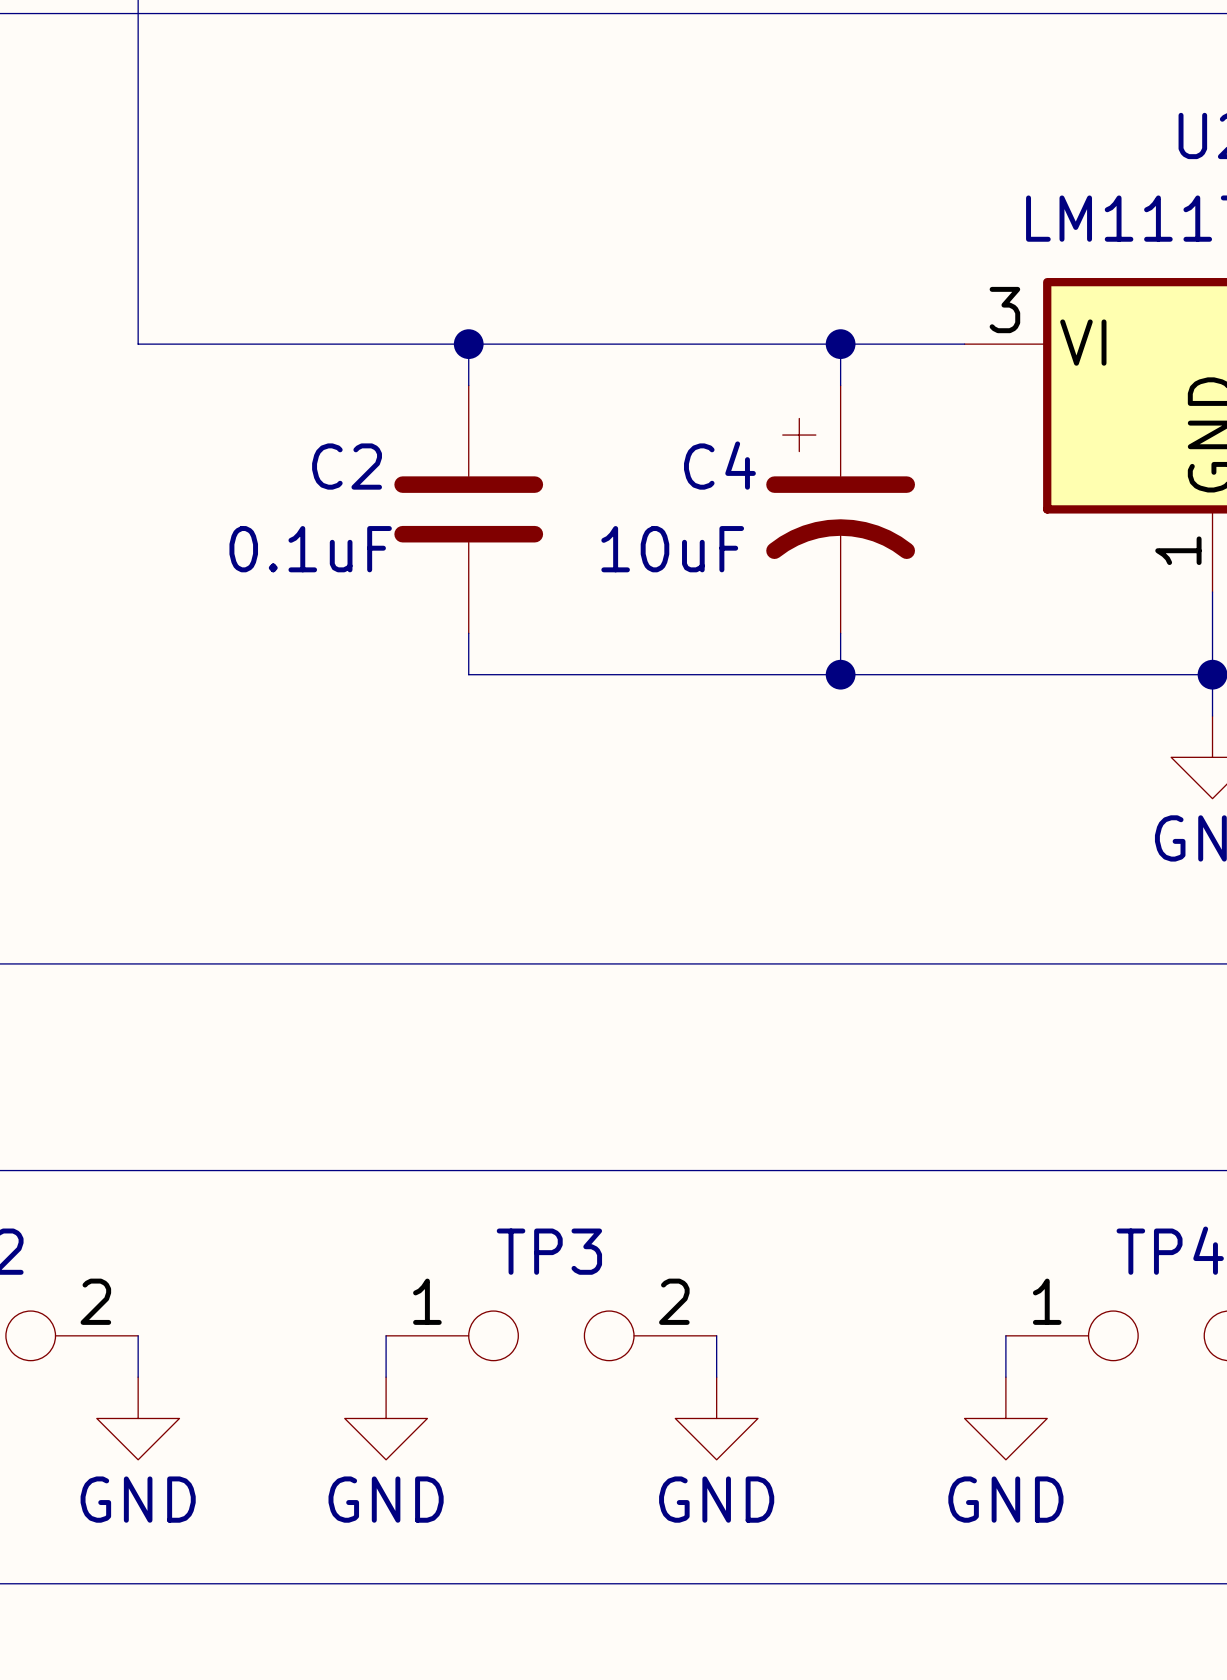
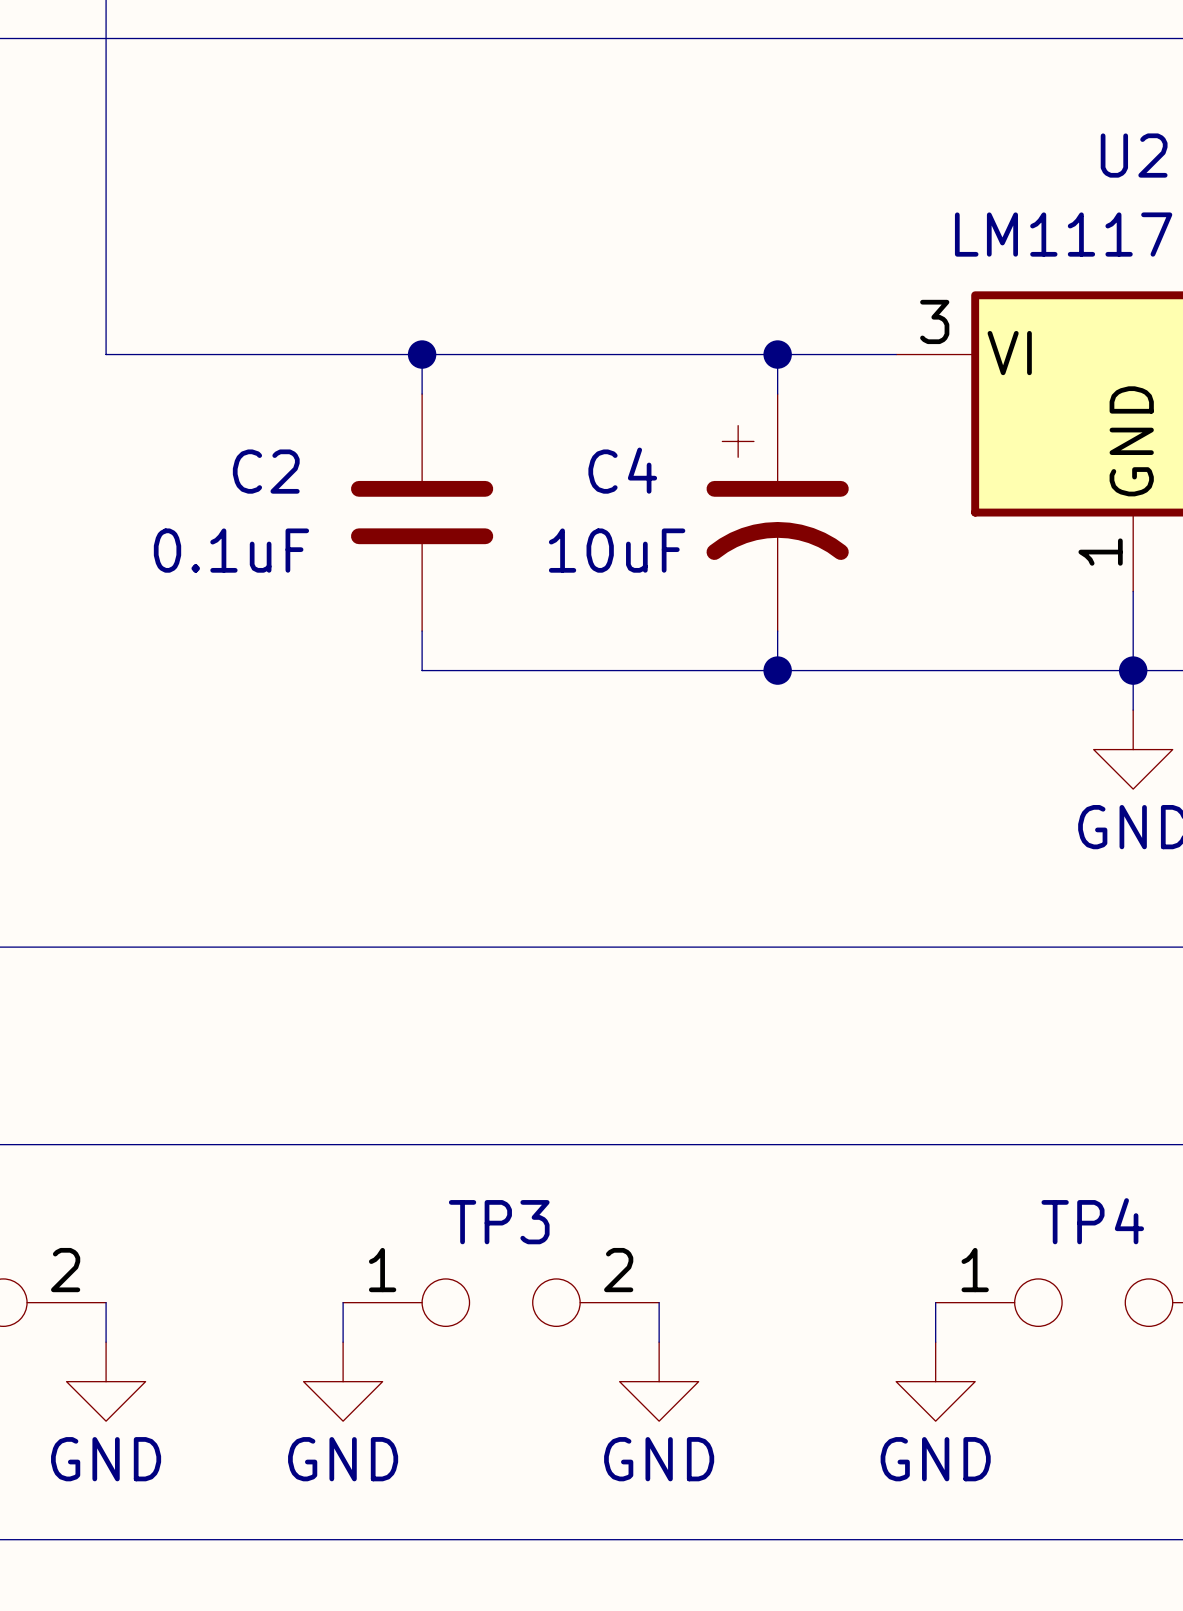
C4 name position: C4 (719, 465) -> C4 (622, 470)
C2 name position: C2 (347, 466) -> C2 (266, 471)
C2 value position: 0.1uF (310, 549) -> 0.1uF (231, 550)

